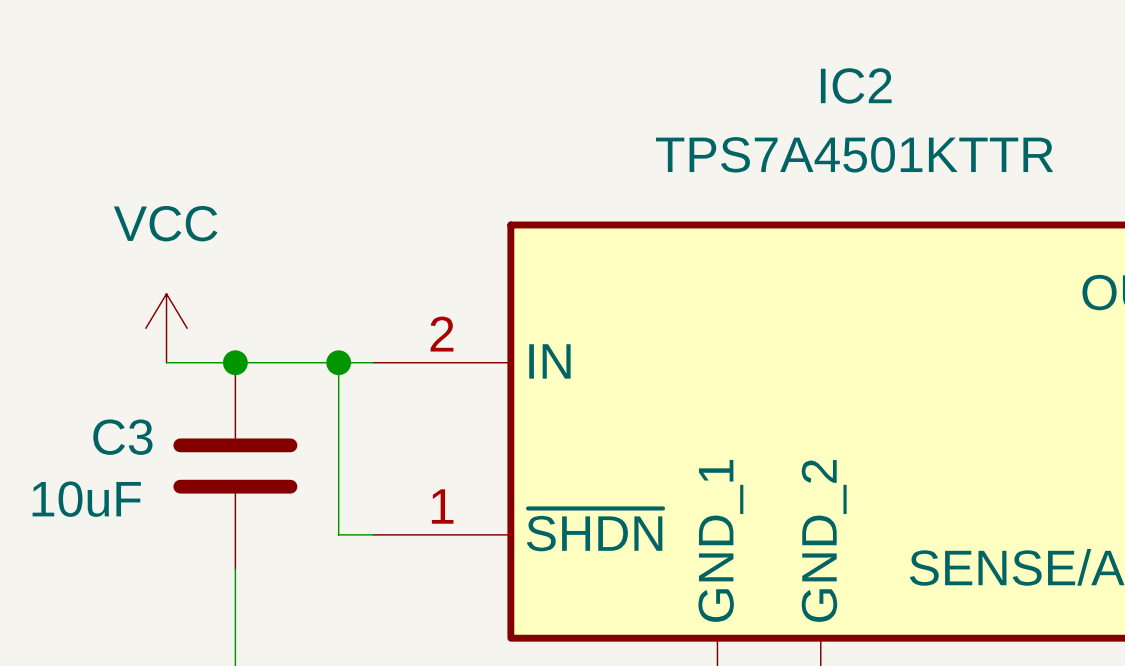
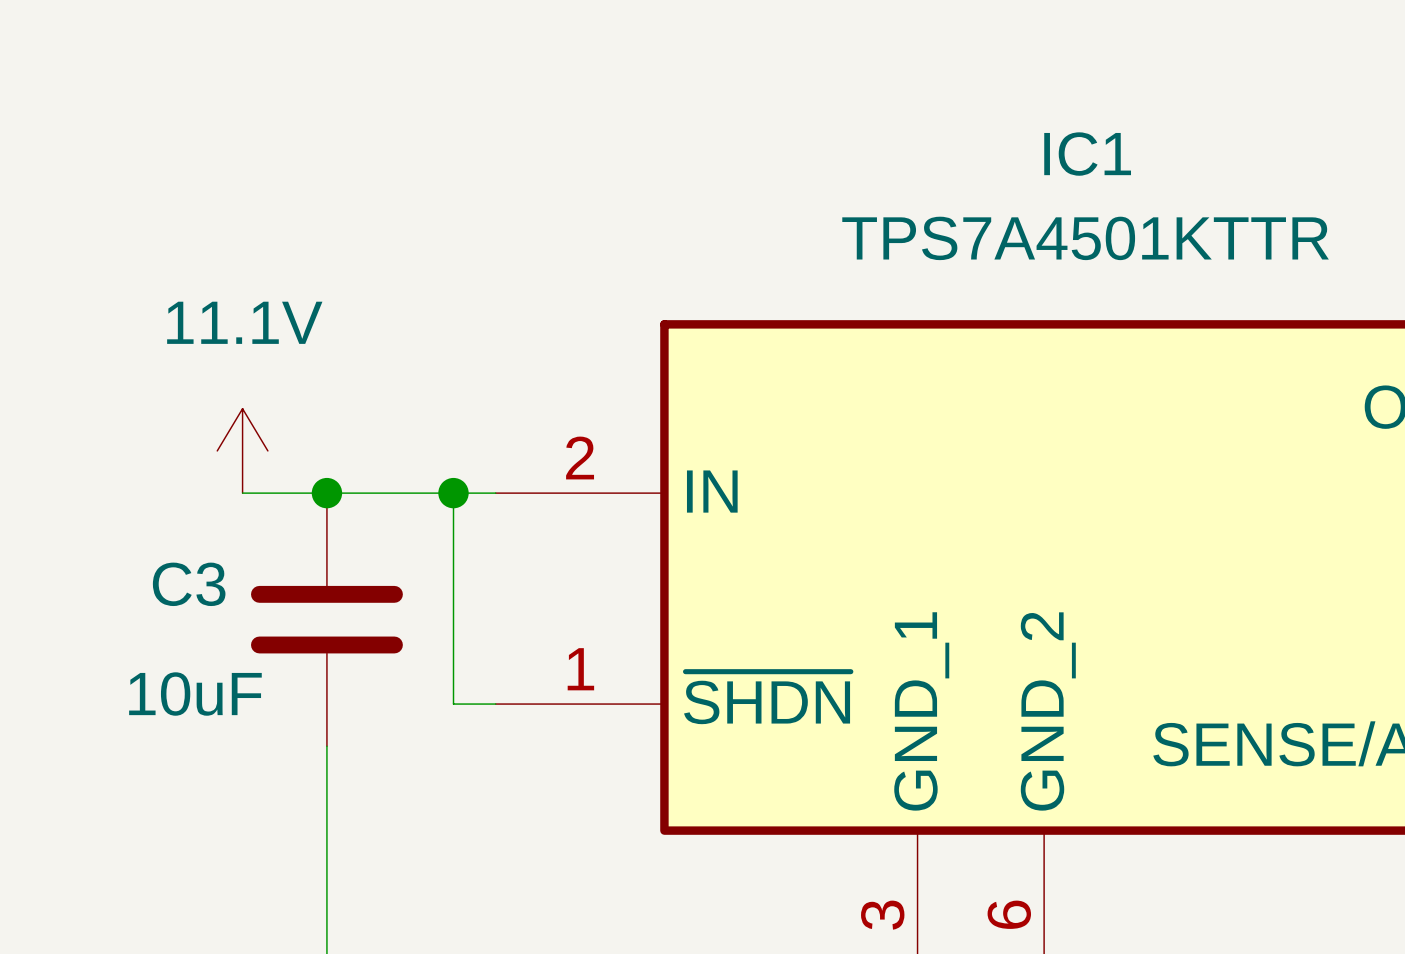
IC2 name: IC2 (856, 85) -> IC1 (1087, 154)
power symbol: VCC (166, 328) -> 11.1V (242, 450)
C3 value position: 10uF (86, 499) -> 10uF (195, 694)

